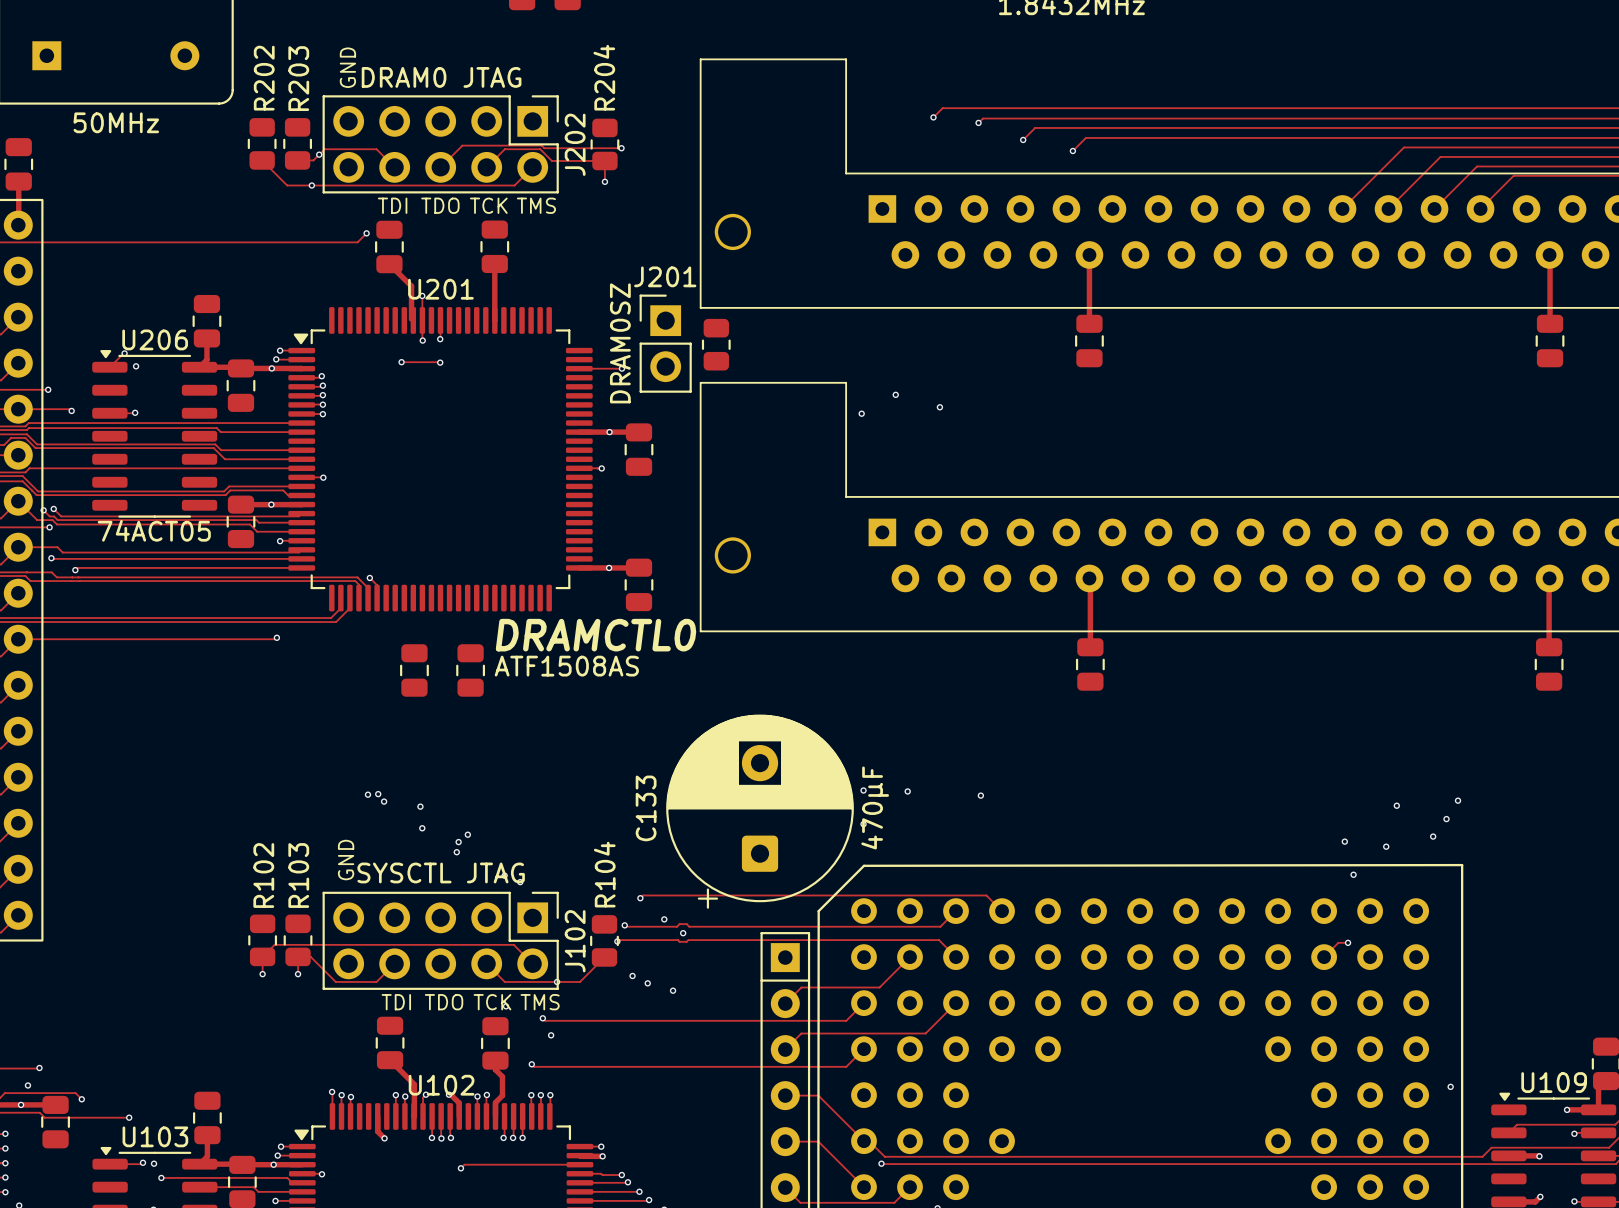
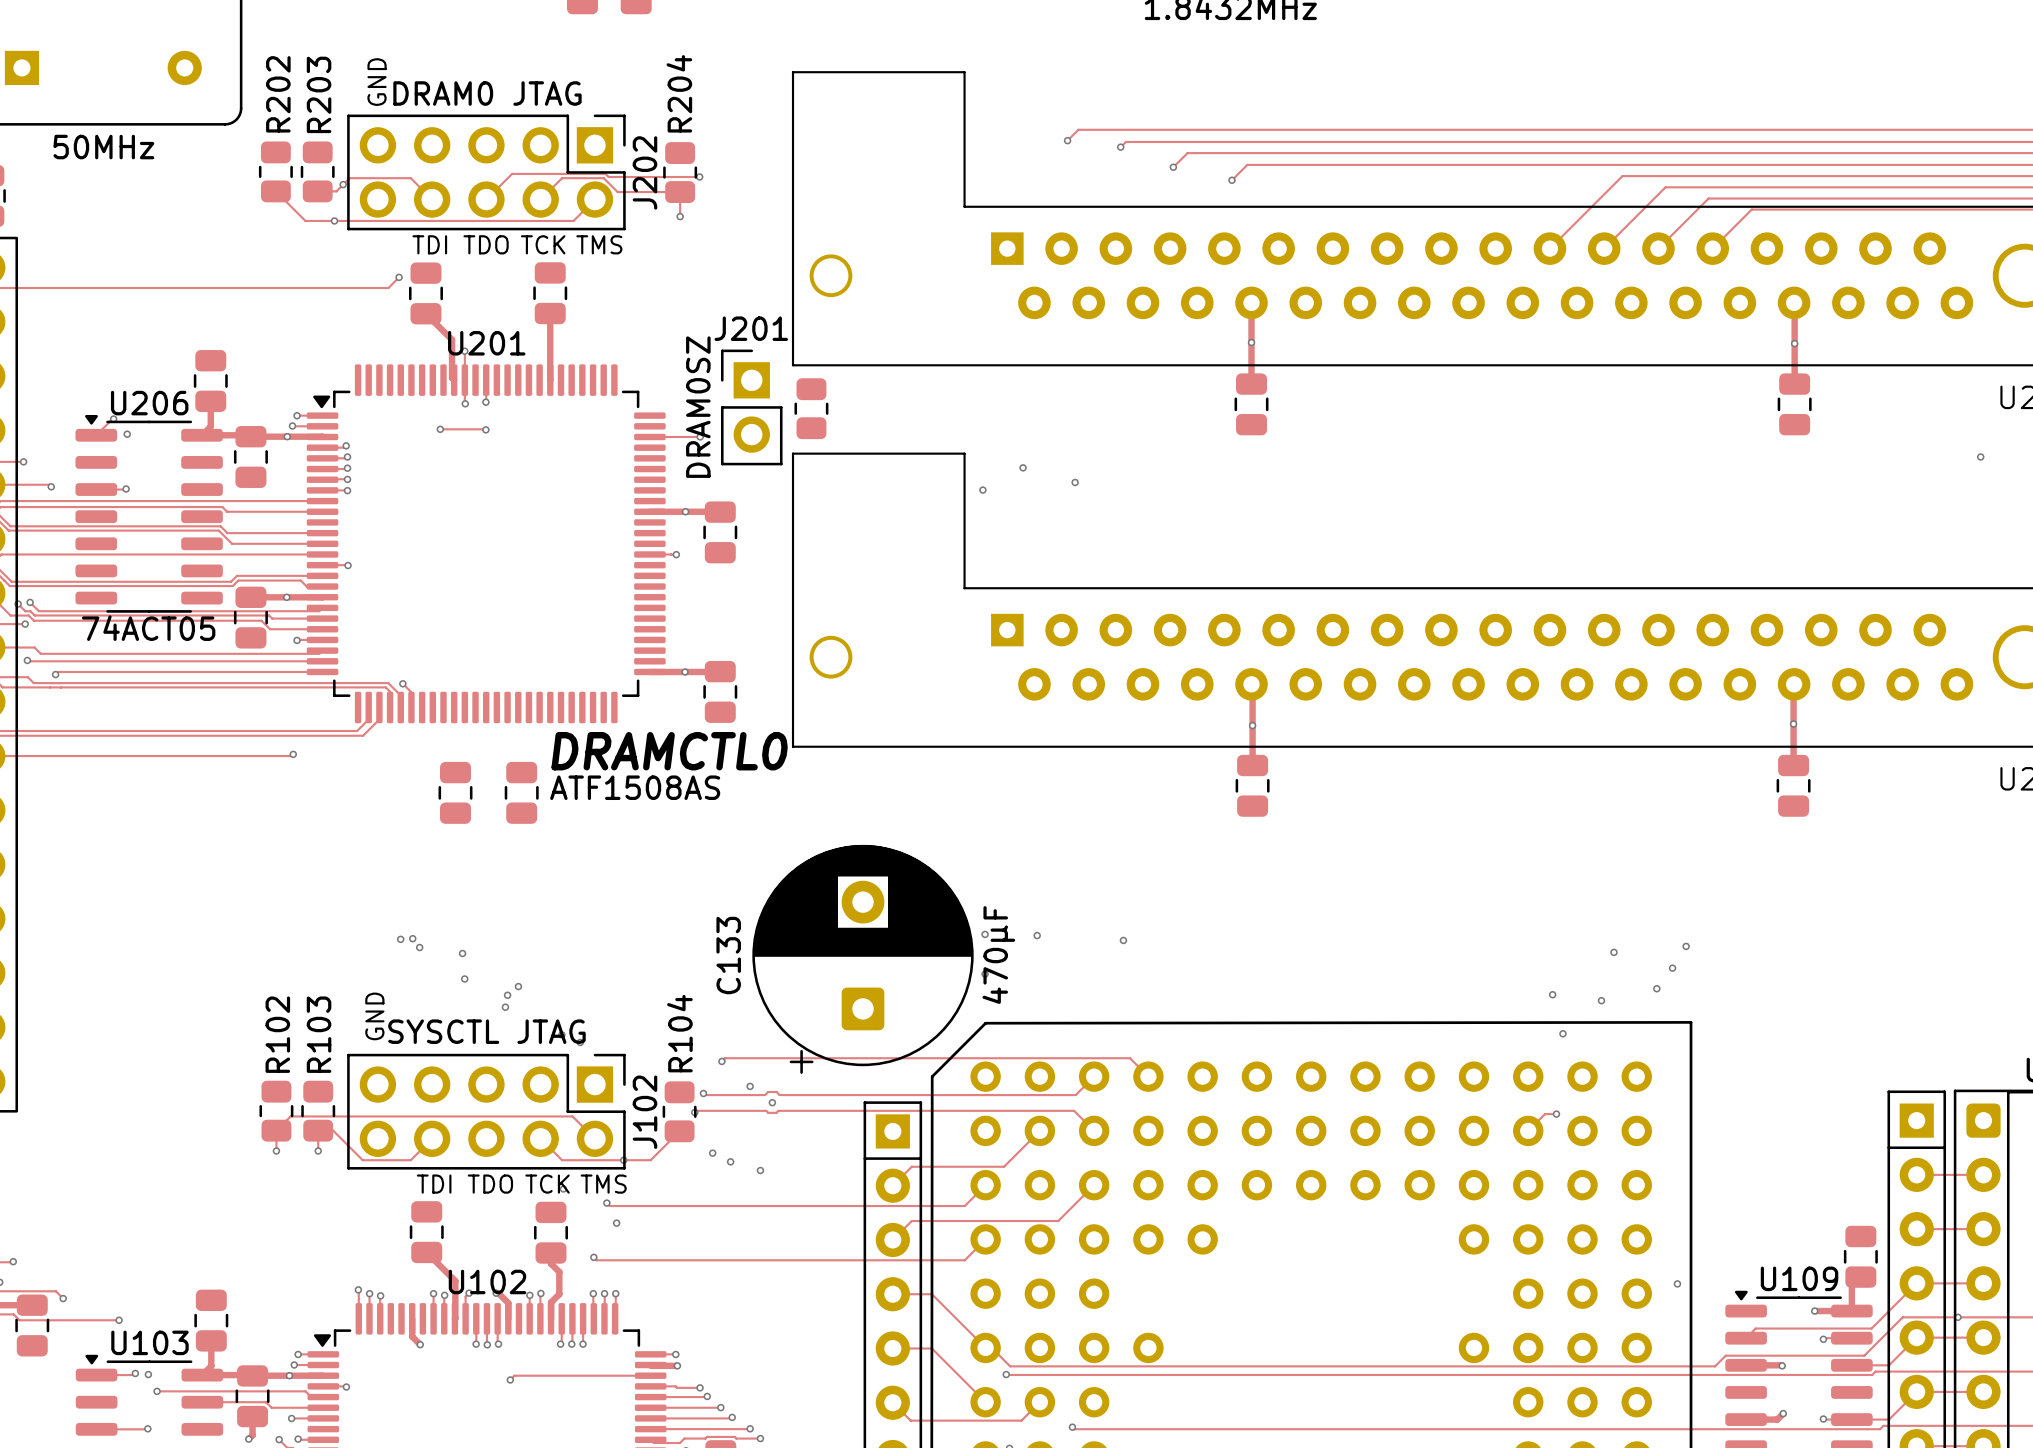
via: none -> (1251, 342)
via: none -> (1794, 343)
via: none -> (1793, 723)
via: none -> (1252, 725)

